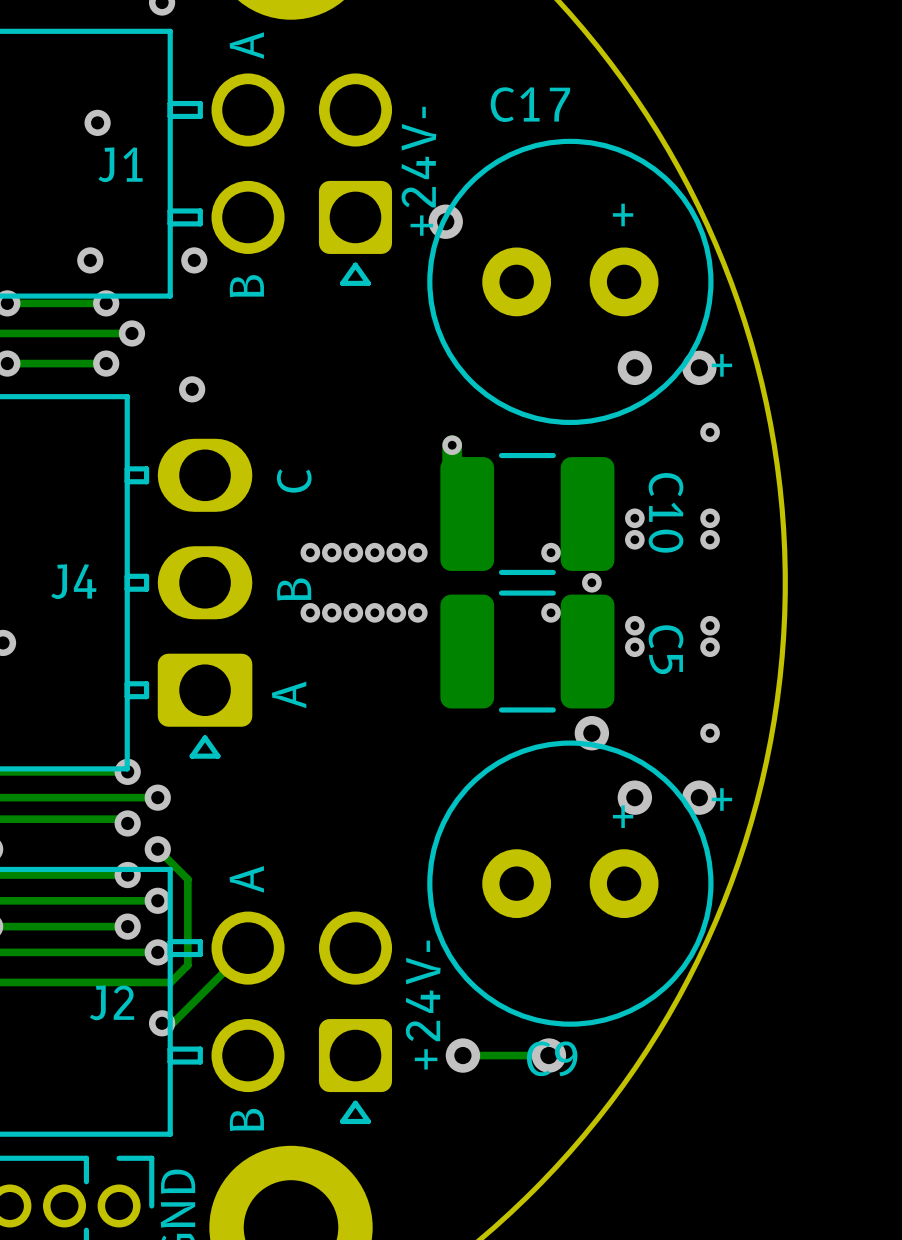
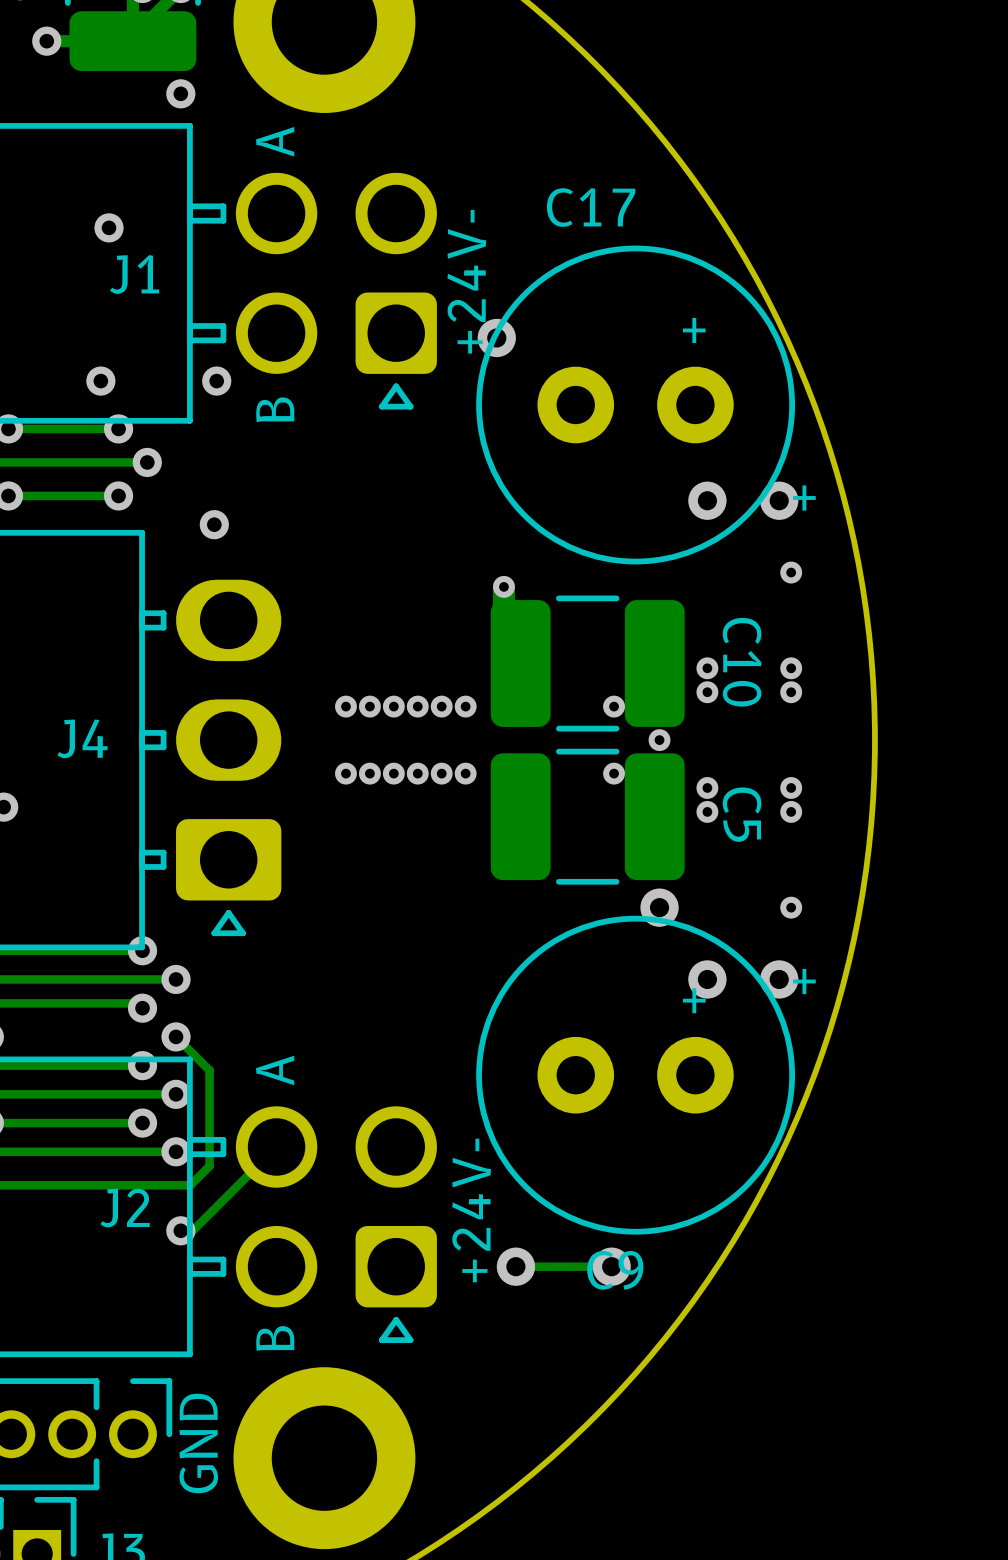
text: C (294, 480) -> none
text: B (294, 589) -> none
text: A (289, 694) -> none

